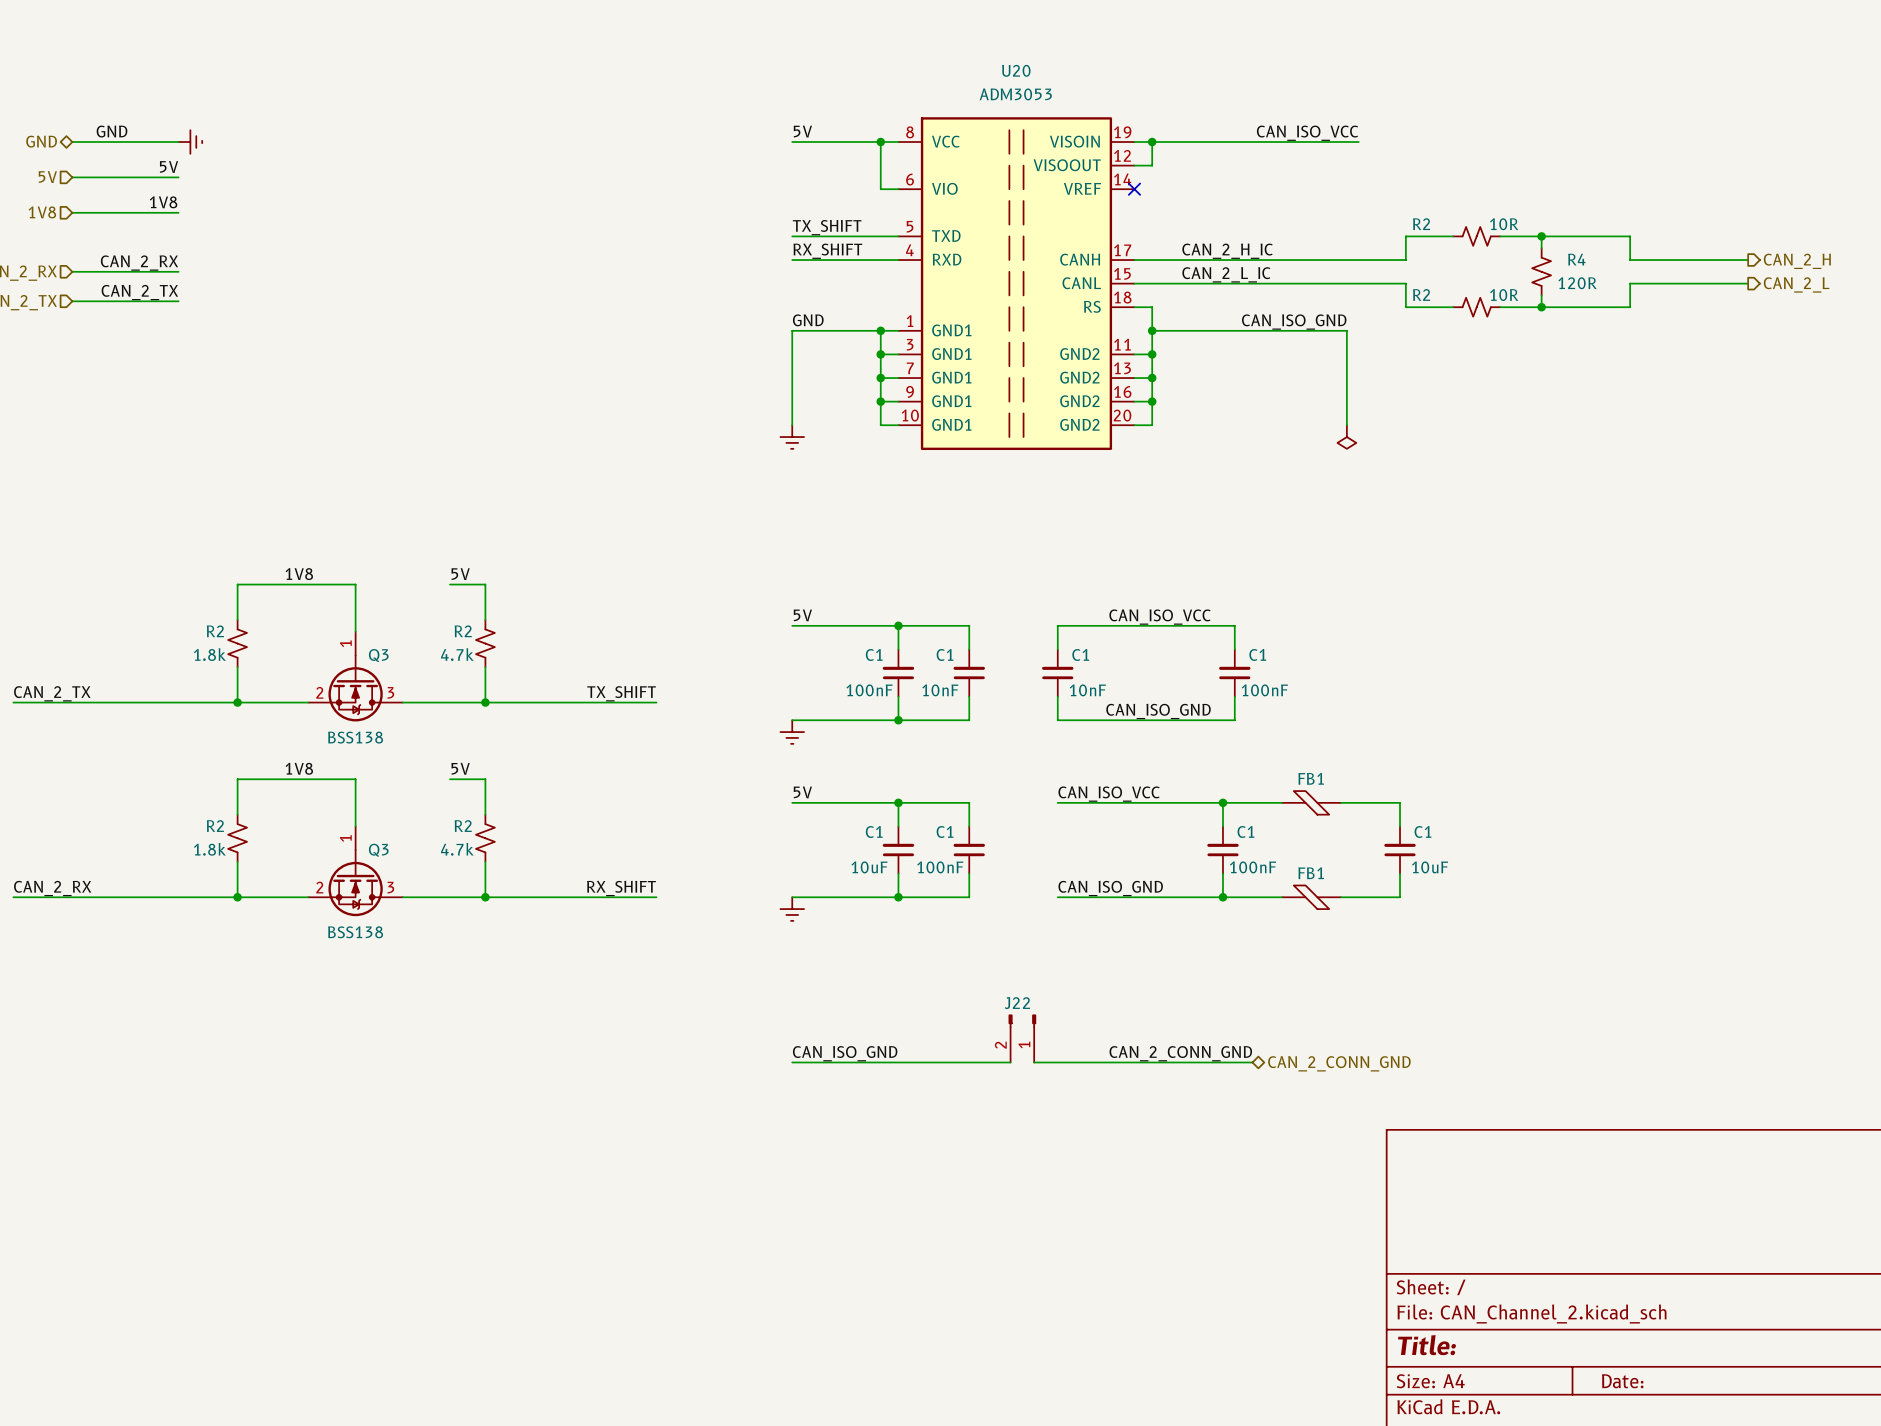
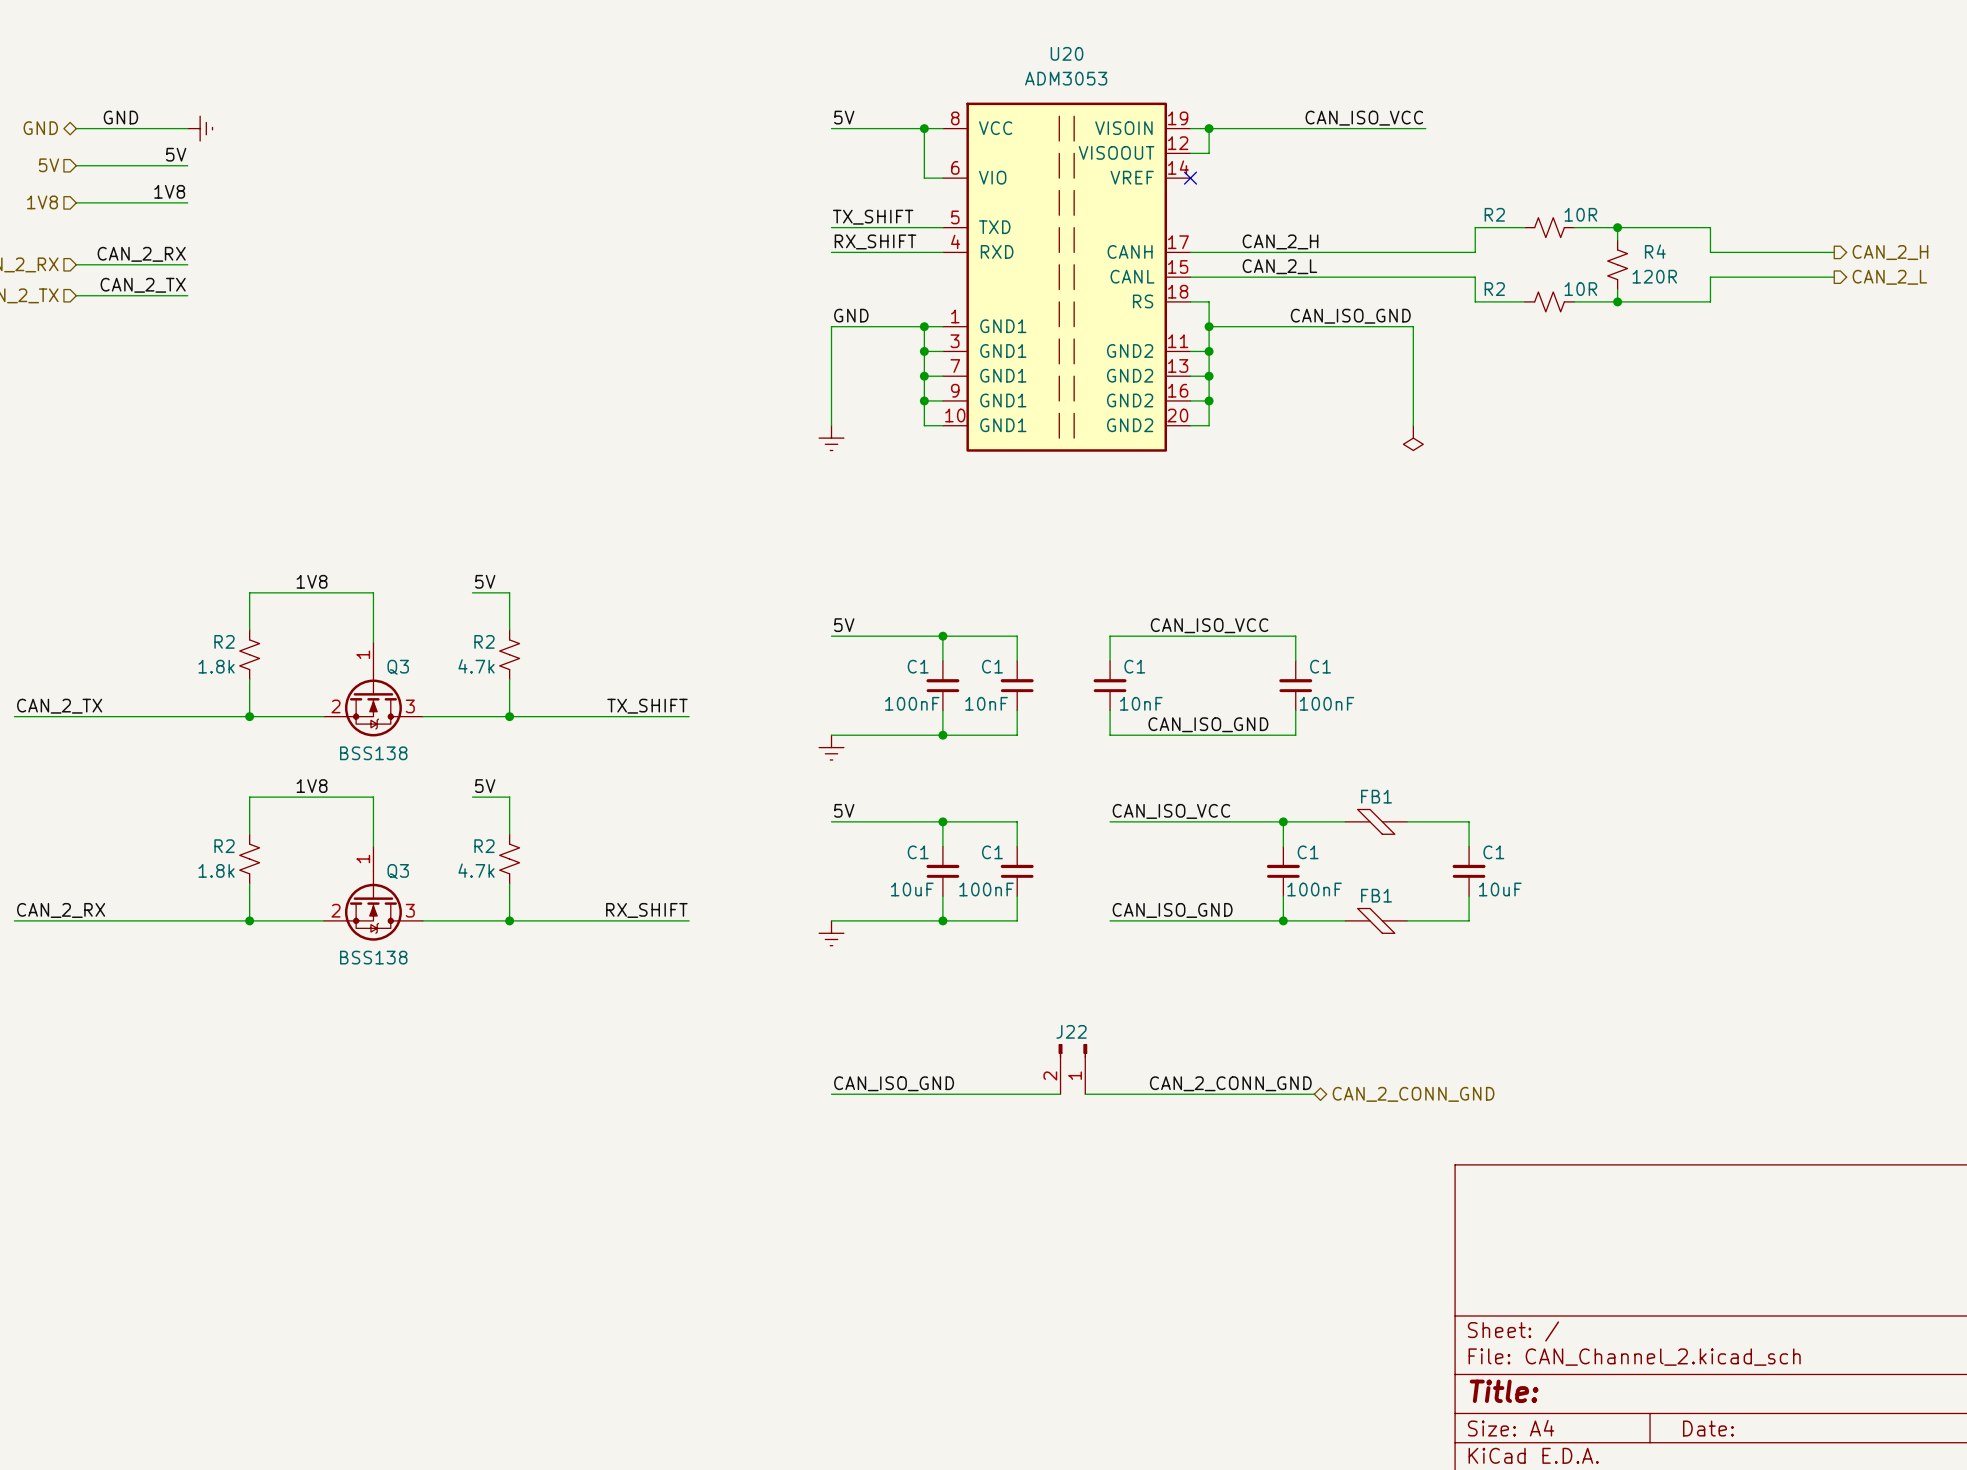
label: CAN_2_H_IC (1227, 251) -> CAN_2_H (1280, 241)
label: CAN_2_L_IC (1226, 274) -> CAN_2_L (1279, 266)

